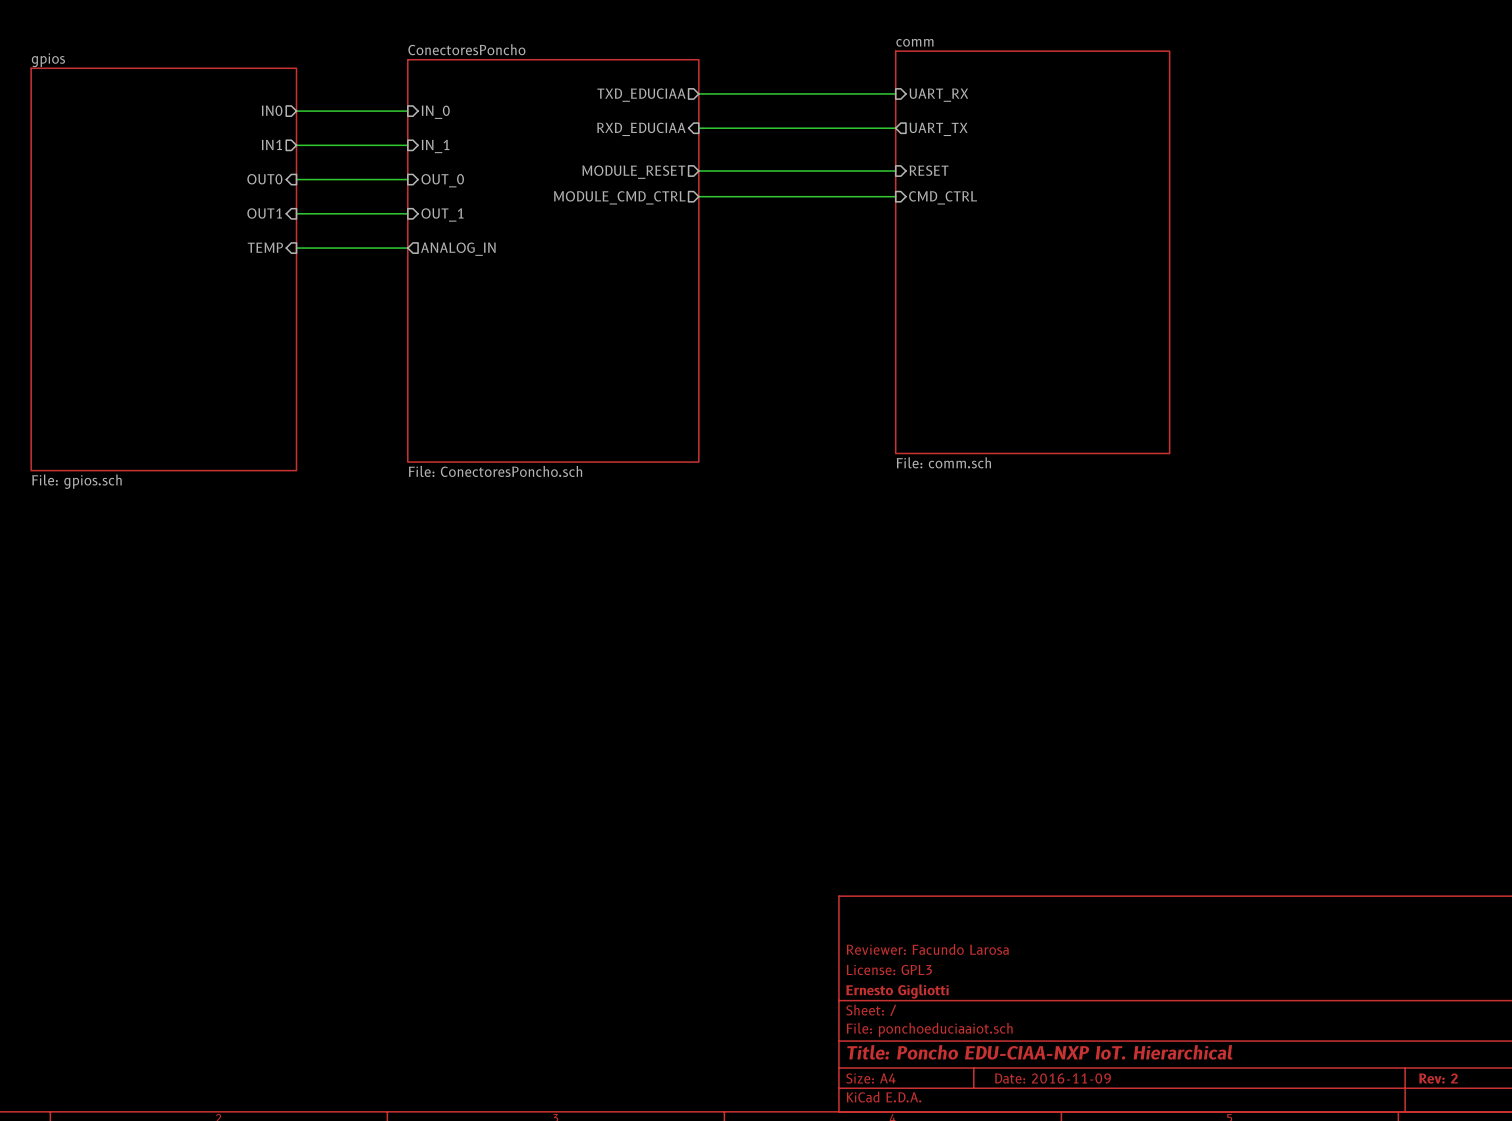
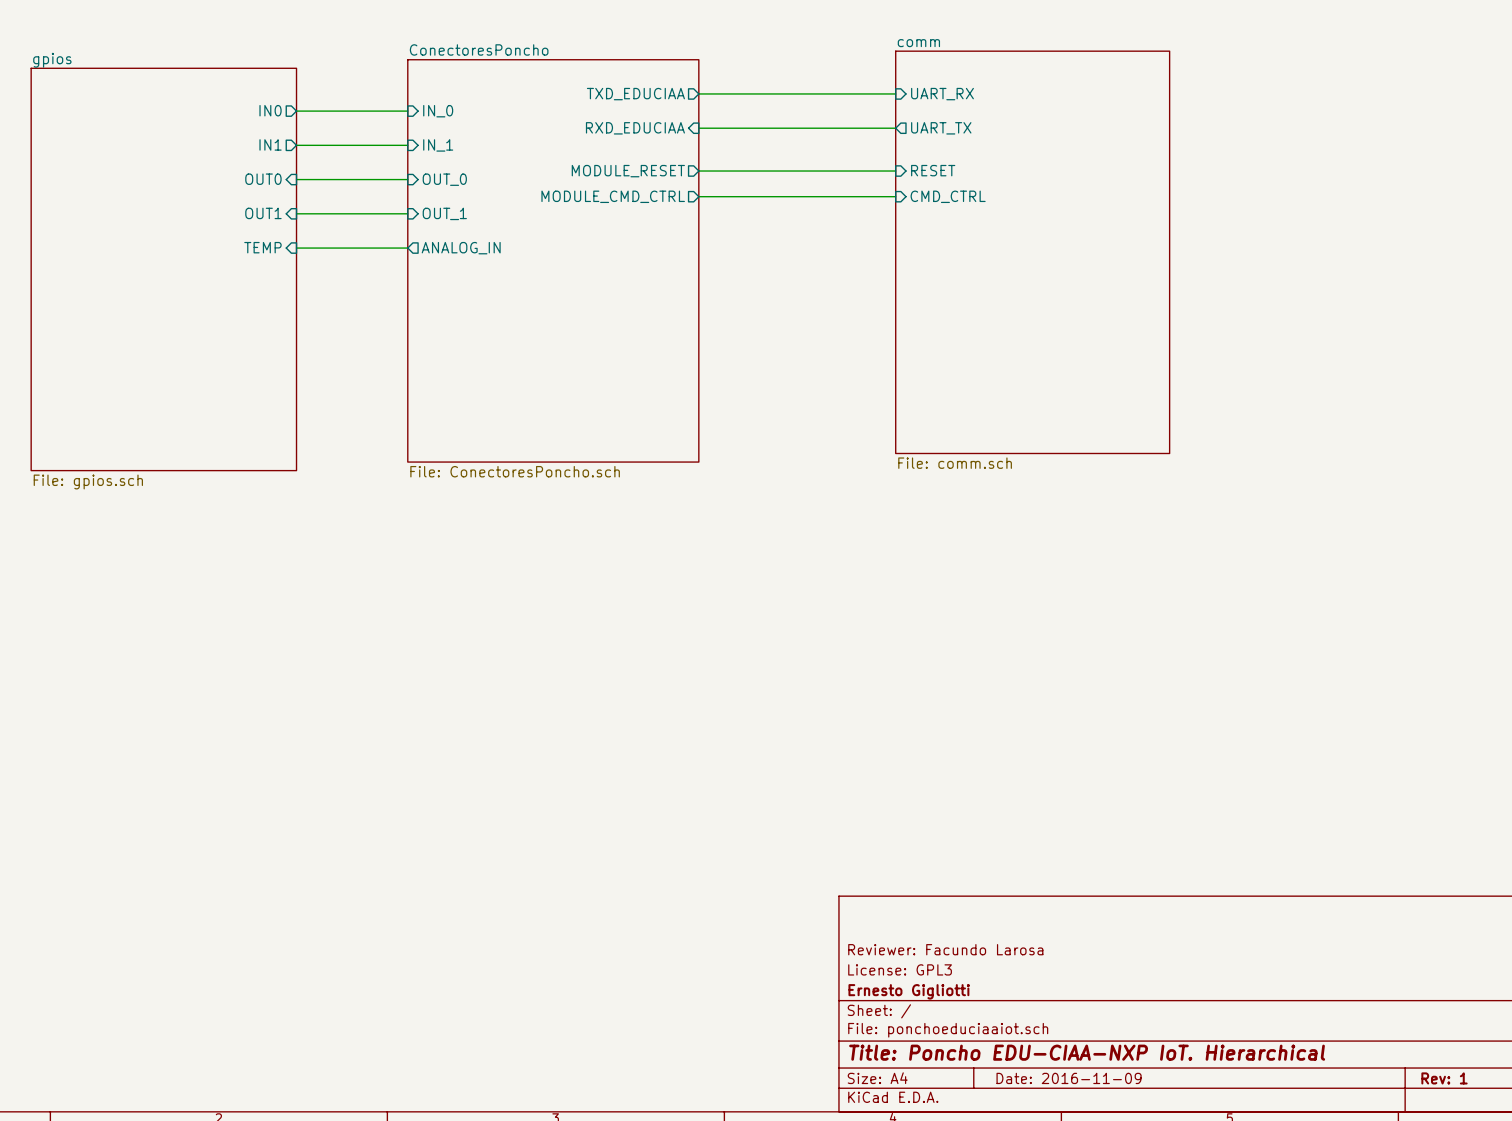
title block: Rev: 2 (1438, 1078) -> Rev: 1 (1444, 1078)

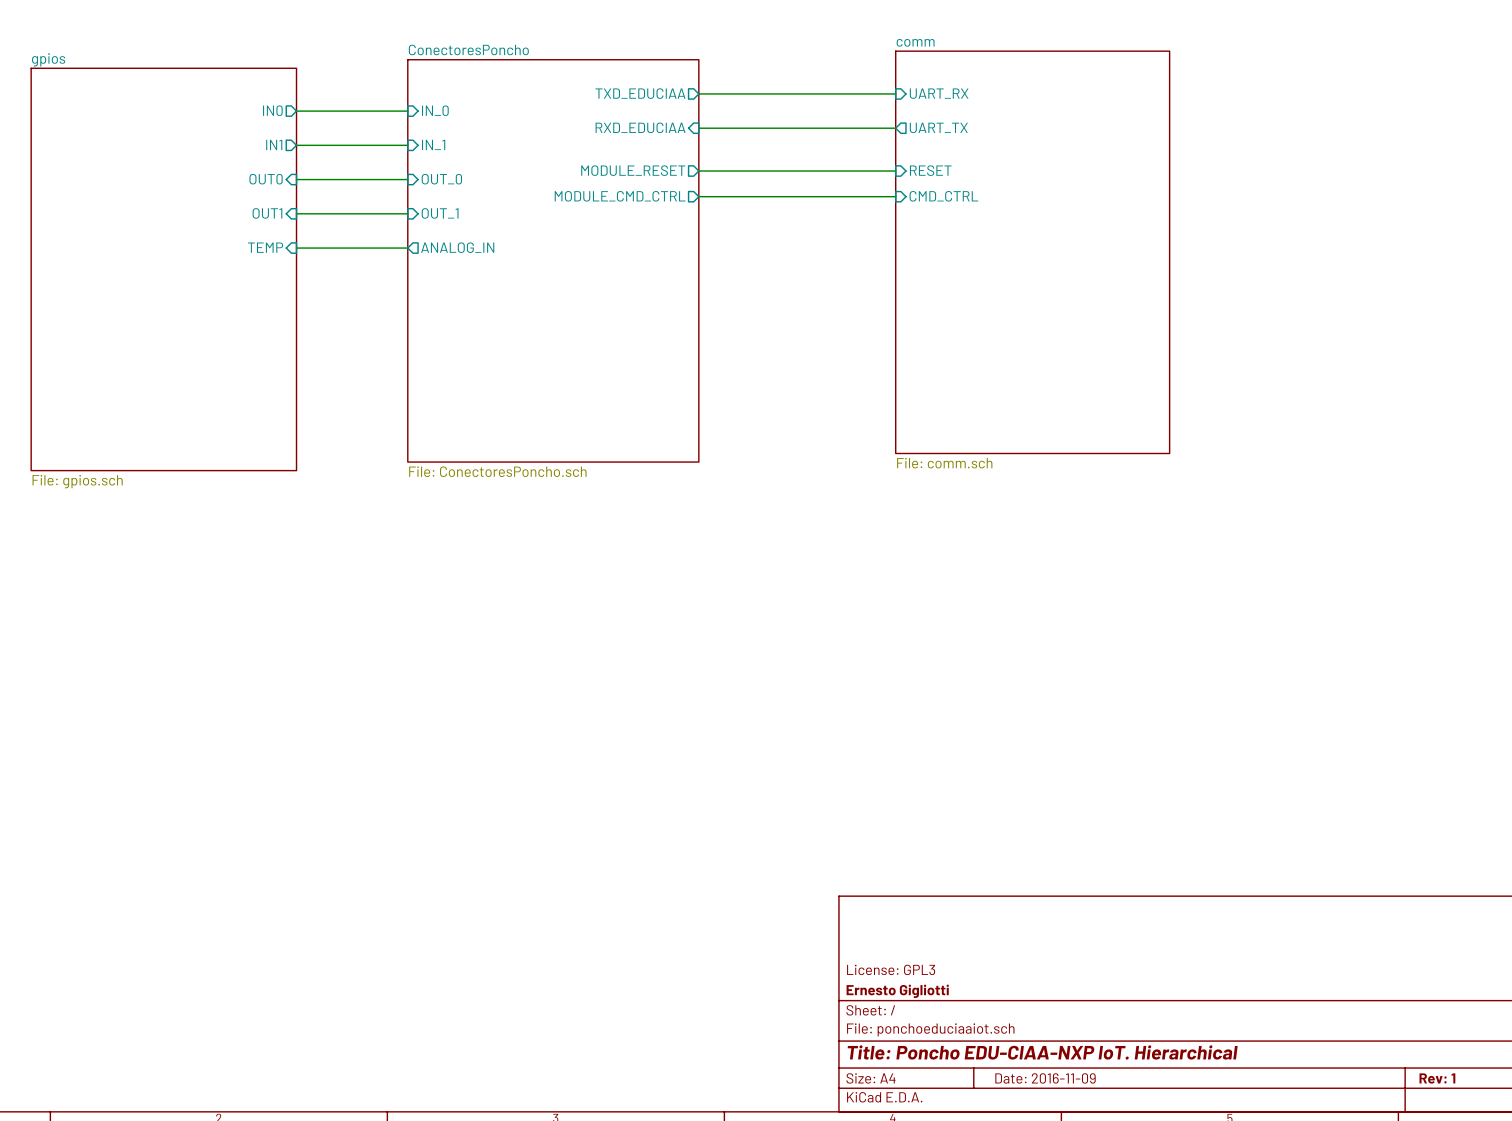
title block: Reviewer: Facundo Larosa (945, 949) -> none

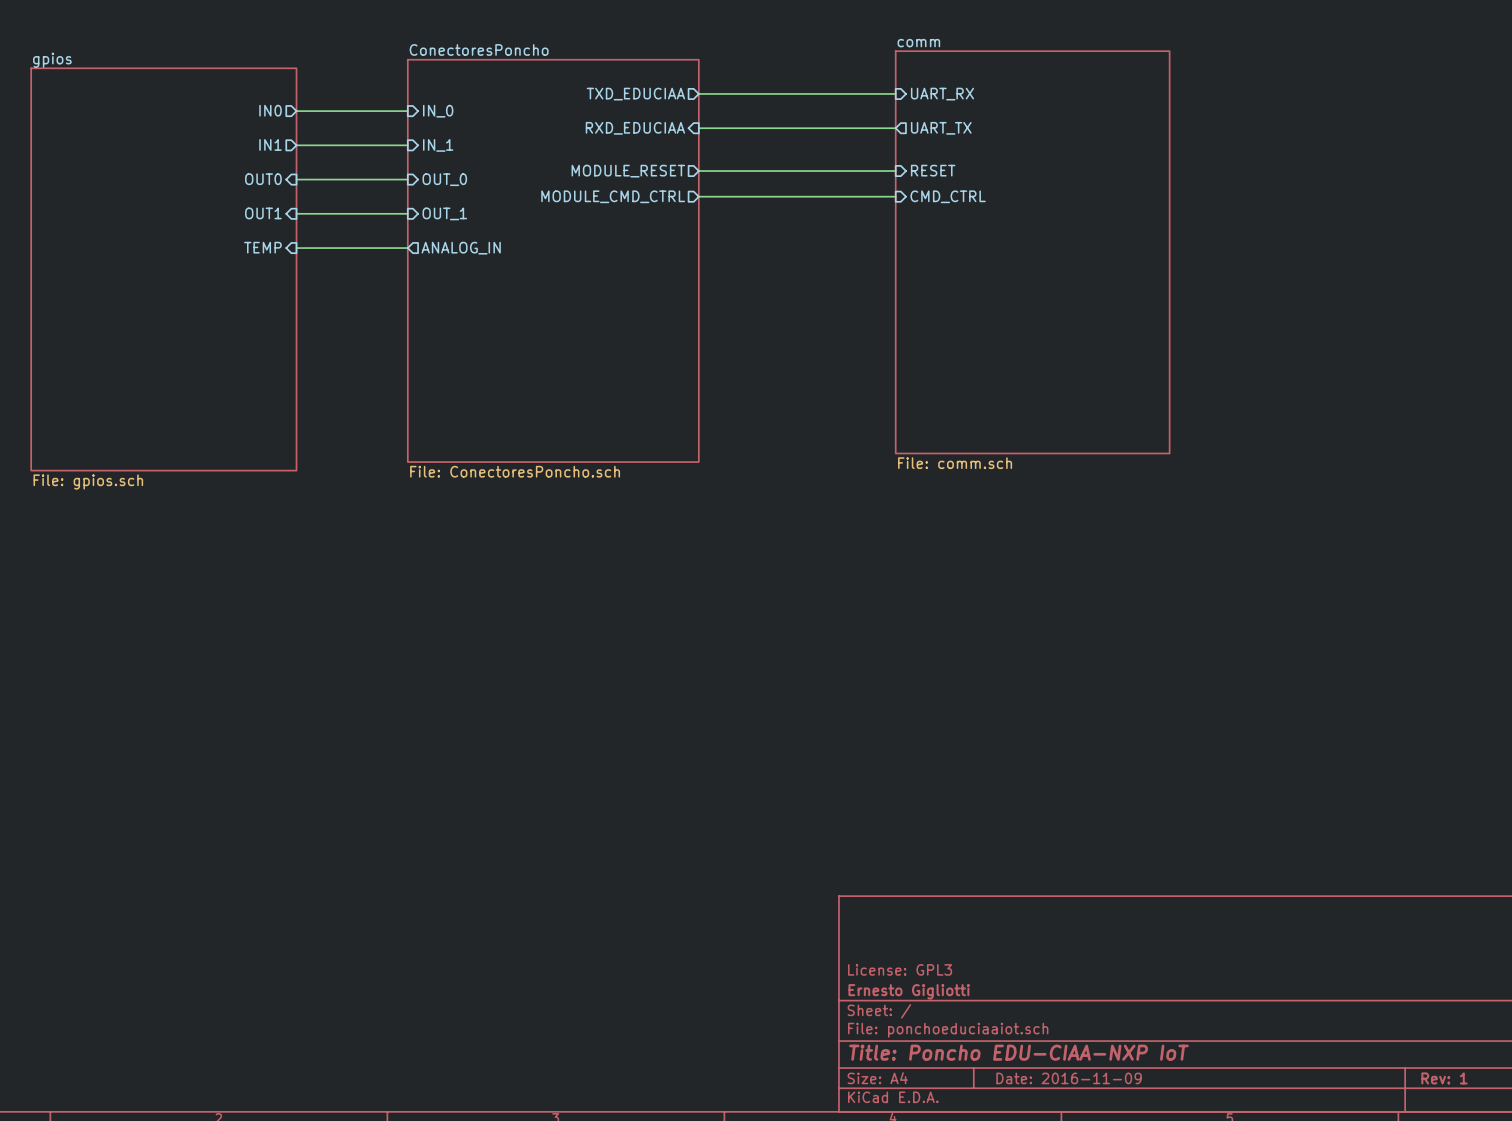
title block: Title: Poncho EDU-CIAA-NXP IoT. Hierarchical (1042, 1052) -> Title: Poncho EDU-CIAA-NXP IoT (1018, 1052)

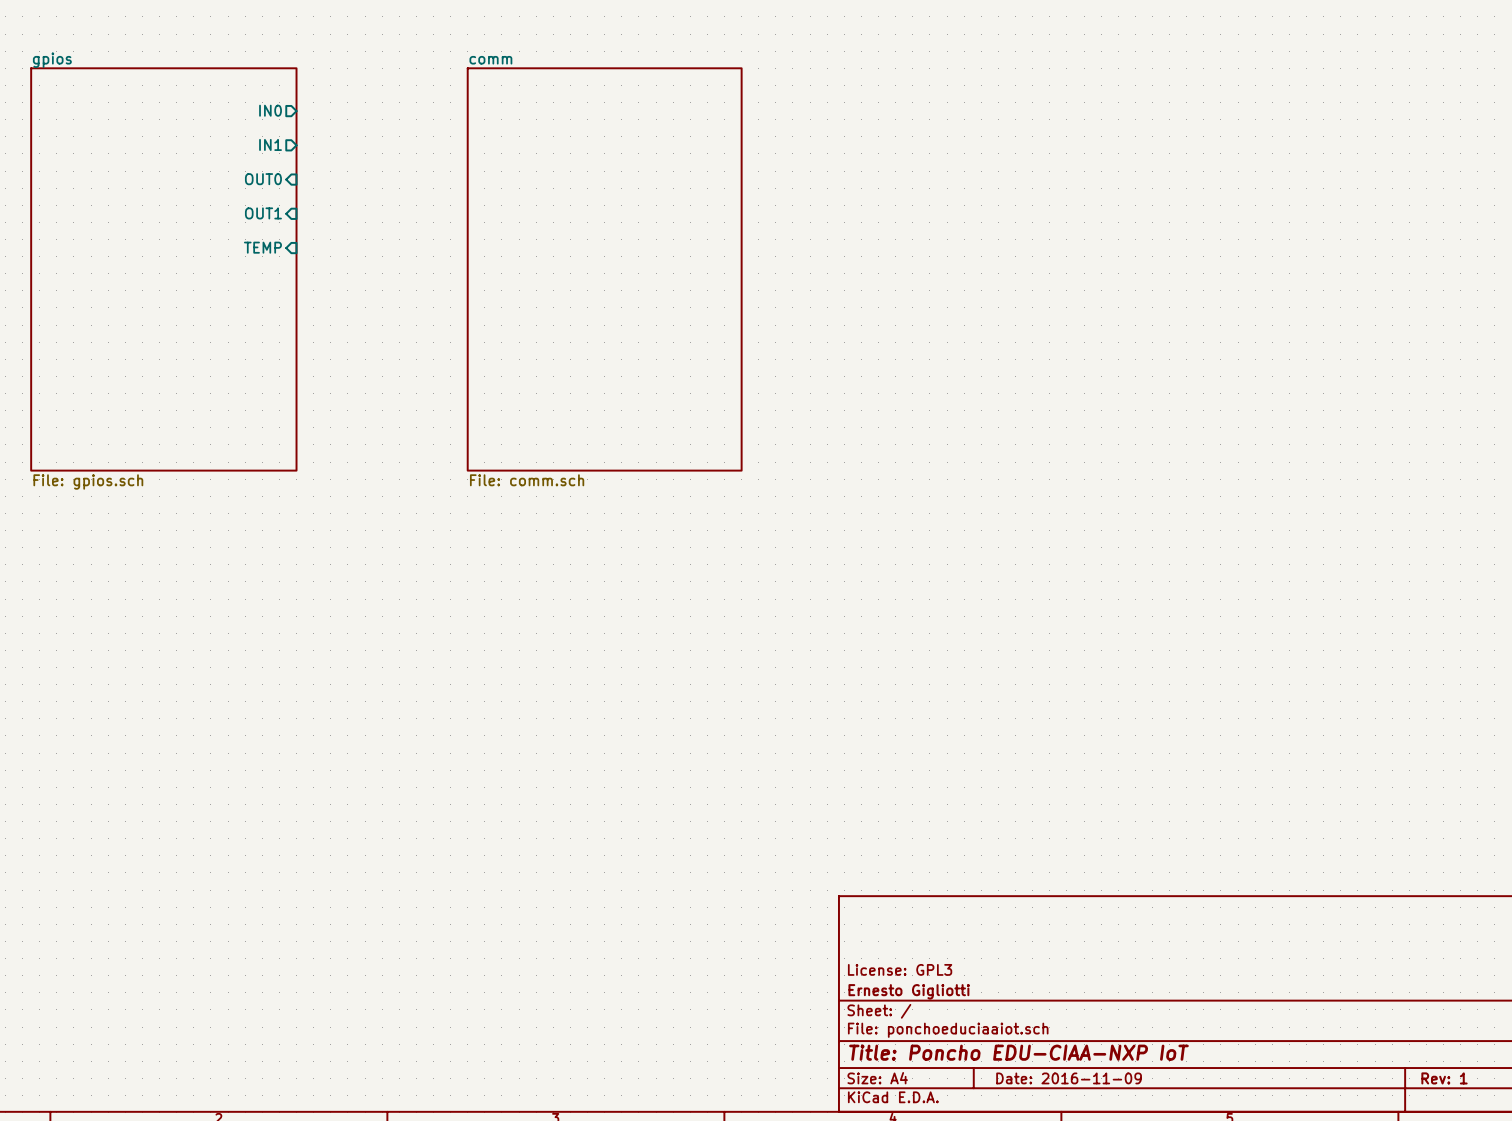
wire: (698, 93) (895, 93) -> none
sheet pin: TXD_EDUCIAA (635, 94) -> none
sheet pin: UART_RX (942, 94) -> none
wire: (296, 111) (407, 111) -> none
sheet pin: IN_0 (438, 111) -> none
sheet pin: RXD_EDUCIAA (635, 128) -> none
wire: (698, 128) (895, 128) -> none
sheet pin: UART_TX (941, 128) -> none
wire: (296, 145) (407, 145) -> none
sheet pin: IN_1 (438, 145) -> none
sheet pin: RESET (933, 170) -> none
sheet pin: MODULE_RESET (628, 171) -> none
wire: (698, 171) (895, 171) -> none
wire: (296, 179) (407, 179) -> none
sheet pin: OUT_0 (444, 179) -> none
sheet pin: MODULE_CMD_CTRL (613, 196) -> none
wire: (698, 196) (895, 196) -> none
sheet pin: CMD_CTRL (948, 196) -> none
wire: (296, 213) (407, 213) -> none
sheet pin: OUT_1 (444, 213) -> none
wire: (296, 248) (407, 248) -> none
sheet pin: ANALOG_IN (461, 248) -> none
sheet comm: File: comm.sch (1032, 252) -> none
sheet ConectoresPoncho: File: ConectoresPoncho.sch (553, 260) -> none
sheet comm: none -> File: comm.sch (604, 269)

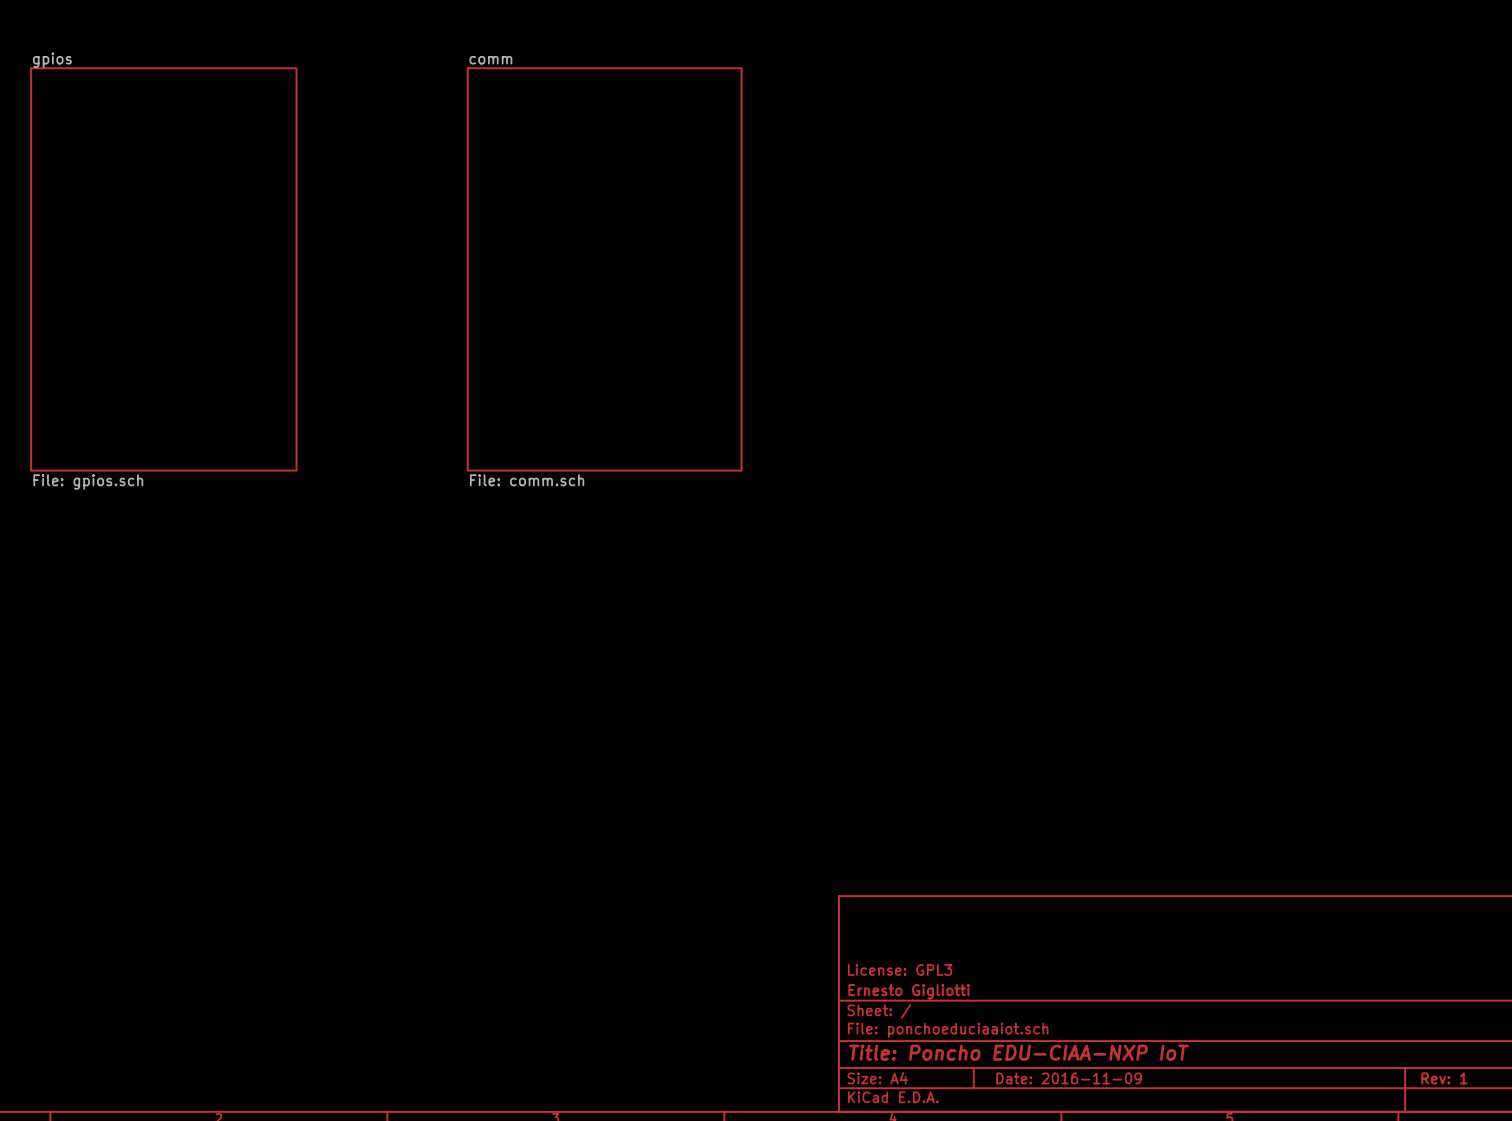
sheet pin: IN0 (270, 110) -> none
sheet pin: IN1 (270, 144) -> none
sheet pin: OUT0 (263, 179) -> none
sheet pin: OUT1 (263, 213) -> none
sheet pin: TEMP (262, 247) -> none

